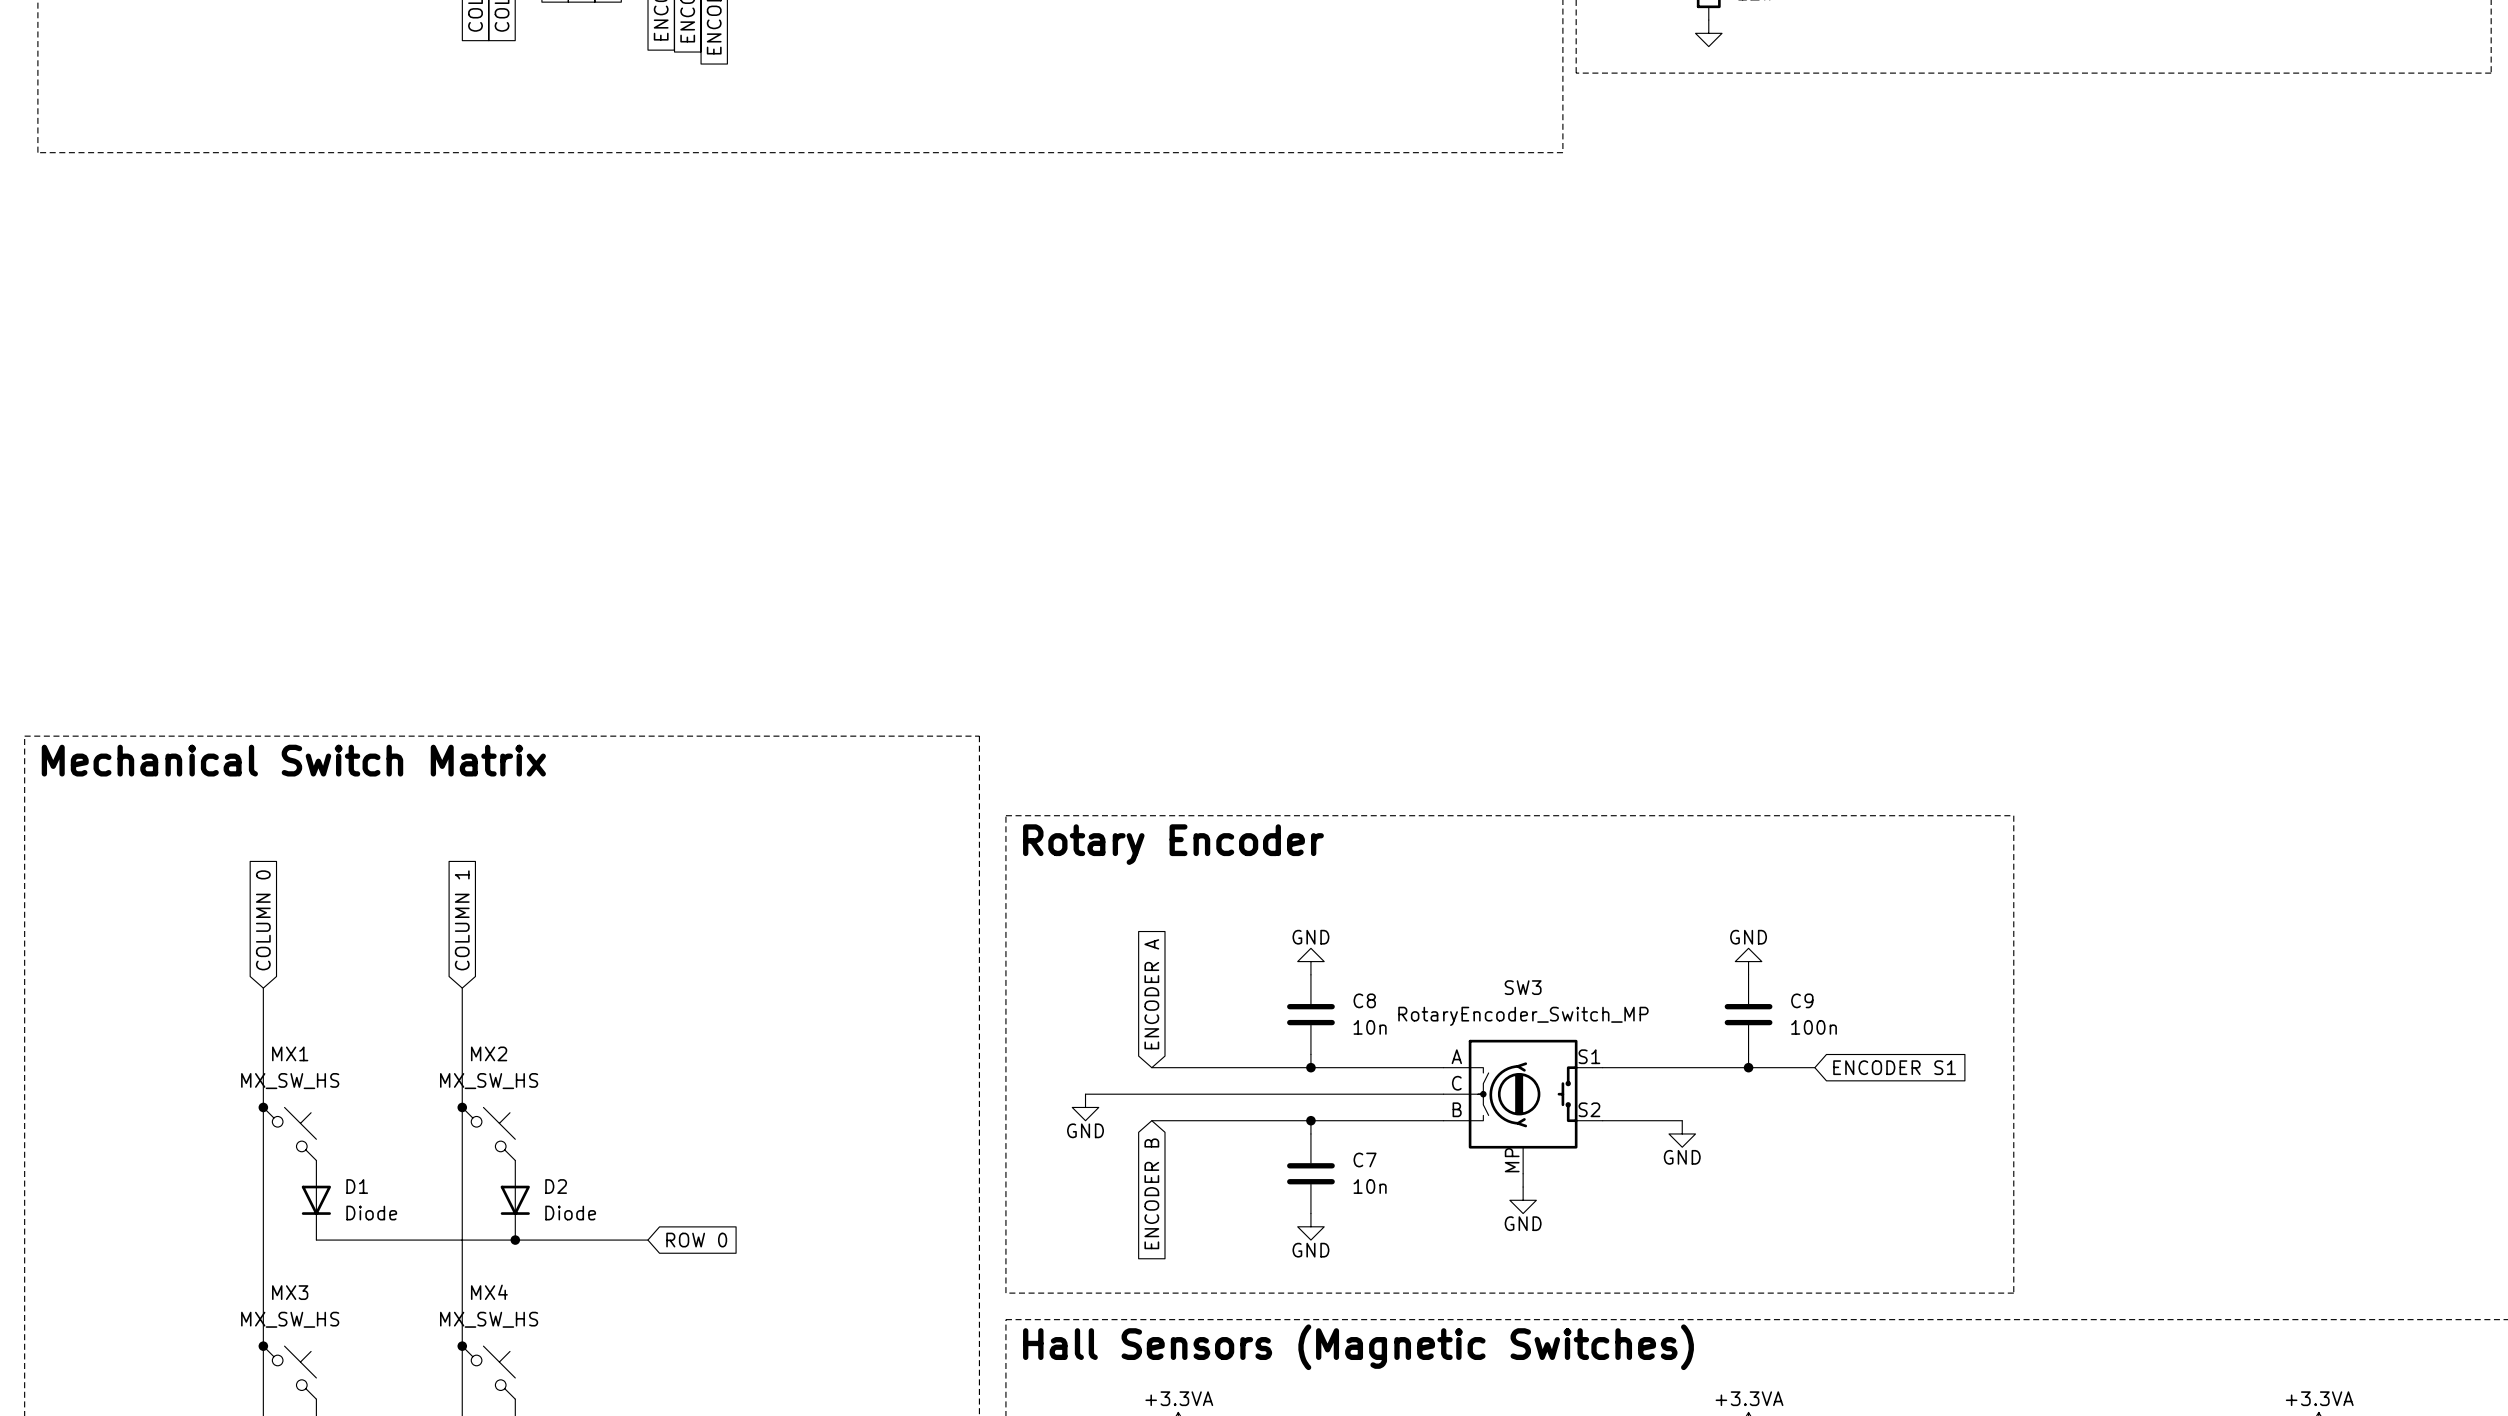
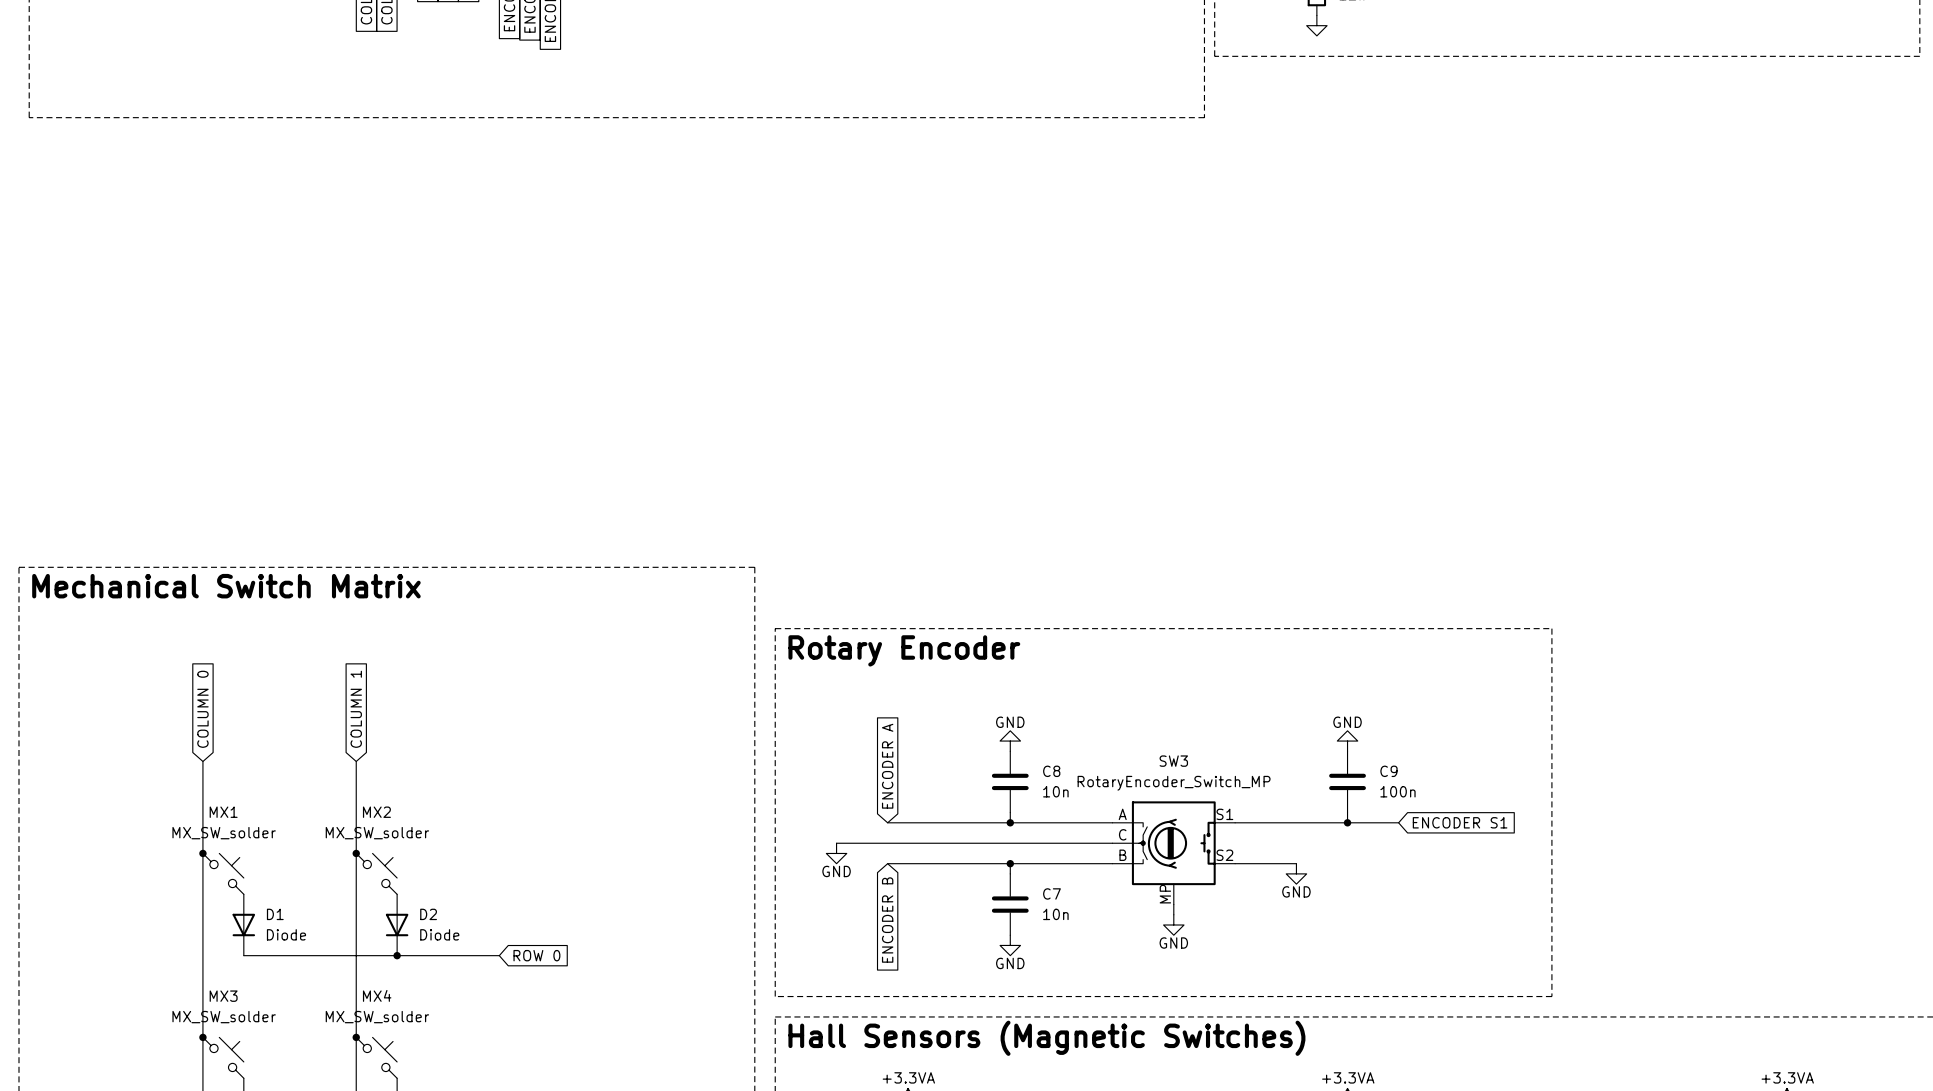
MX1 value: MX_SW_HS (290, 1081) -> MX_SW_solder (224, 833)
MX2 value: MX_SW_HS (489, 1081) -> MX_SW_solder (377, 833)
MX3 value: MX_SW_HS (290, 1319) -> MX_SW_solder (224, 1017)
MX4 value: MX_SW_HS (489, 1319) -> MX_SW_solder (377, 1017)

